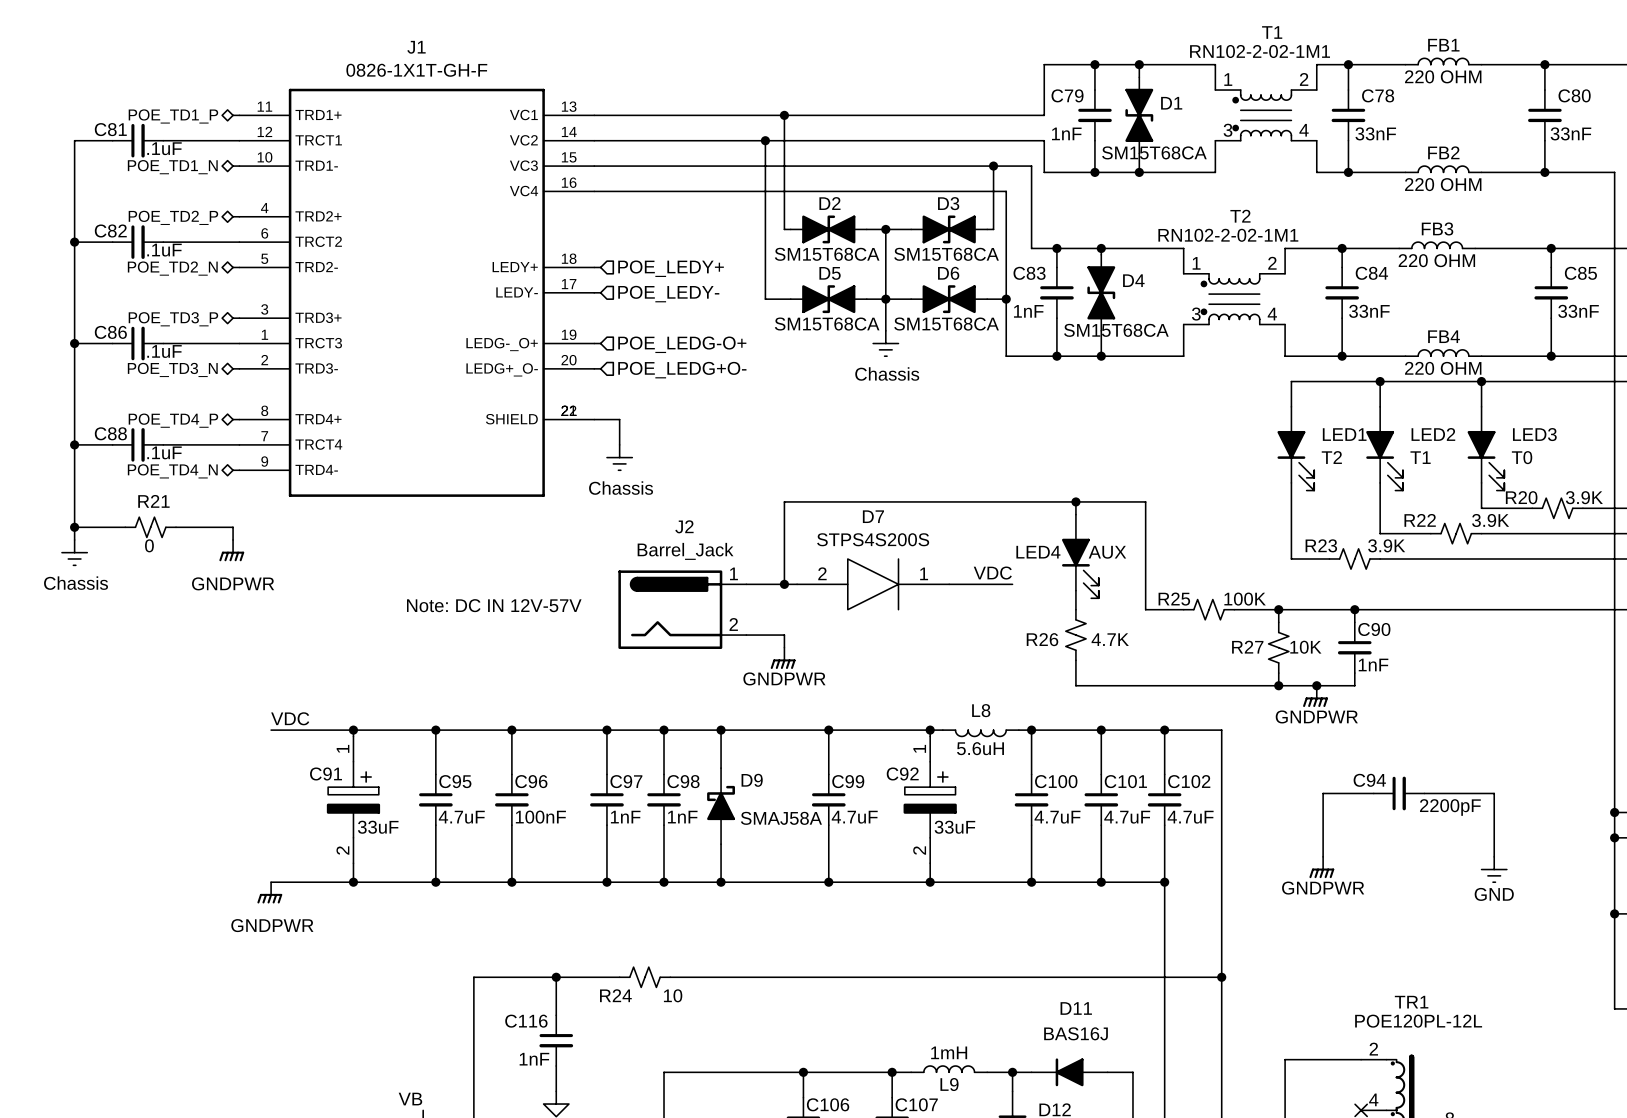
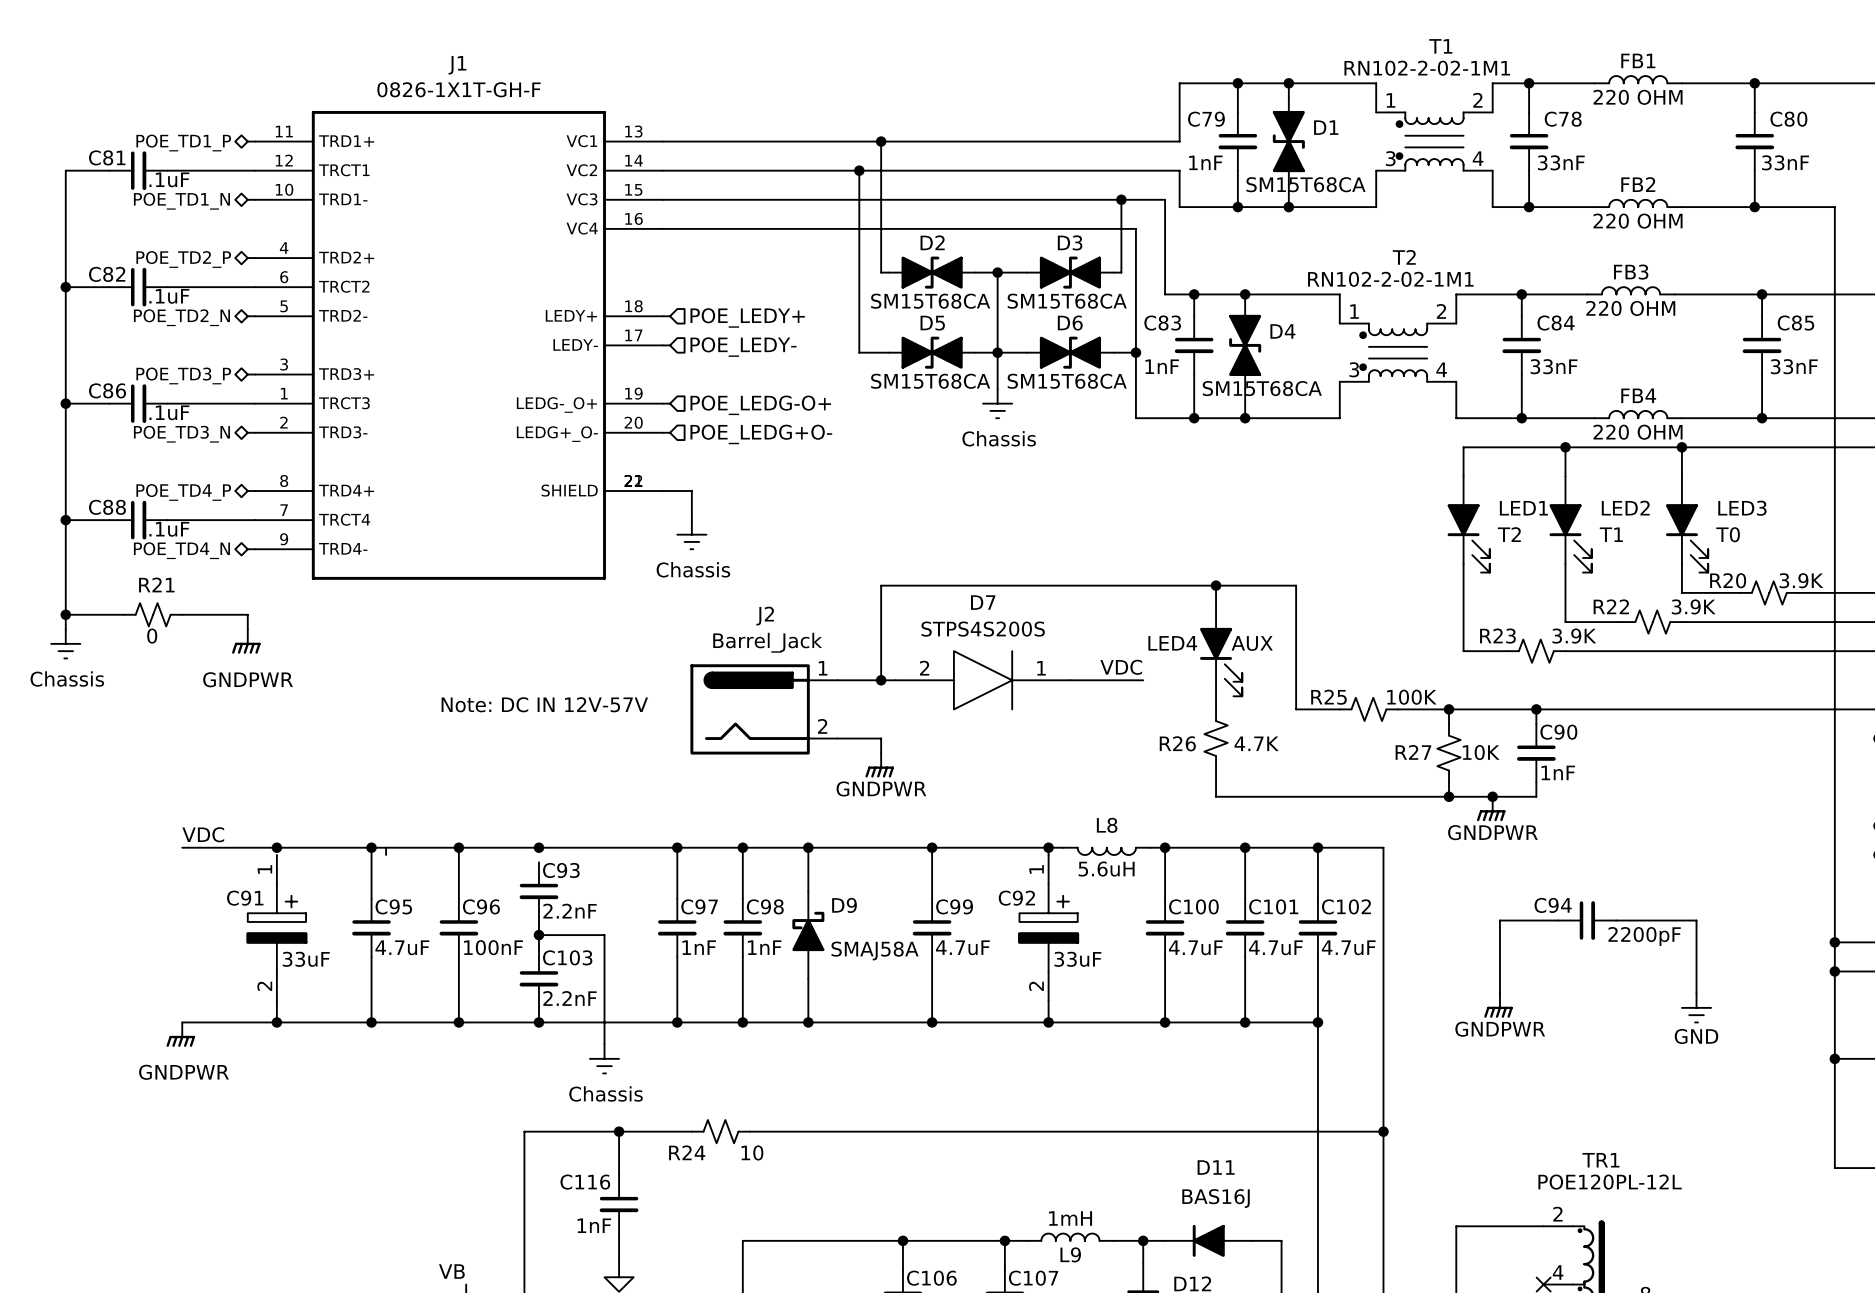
label position: VDC (290, 718) -> VDC (203, 834)
wire: none -> (182, 847) (291, 847)
junction: none -> (276, 847)
junction position: (353, 730) -> (371, 847)
wire: (435, 730) (435, 774) -> (371, 847) (371, 898)
junction position: (435, 730) -> (458, 847)
junction: none -> (538, 847)
wire: (511, 730) (511, 774) -> (458, 847) (458, 898)
junction: (511, 730) -> none
C93: none -> 2.2nF (538, 891)
wire: none -> (538, 920) (538, 949)
C91 position: (353, 799) -> (276, 927)
C95 position: (435, 799) -> (371, 927)
C96 position: (511, 799) -> (458, 927)
wire: none -> (538, 935) (604, 935) (604, 1044)
junction: none -> (538, 935)
wire: (435, 825) (435, 882) -> (371, 956) (371, 1022)
wire: (511, 825) (511, 882) -> (458, 956) (458, 1022)
C103: none -> 2.2nF (538, 978)
wire: (353, 863) (353, 882) -> (276, 1000) (276, 1022)
wire: none -> (538, 1007) (538, 1022)
wire: none -> (182, 1022) (291, 1022)
junction: none -> (276, 1022)
junction position: (353, 882) -> (371, 1022)
junction position: (435, 882) -> (458, 1022)
junction: none -> (538, 1022)
junction: (511, 882) -> none
power symbol position: GNDPWR (269, 892) -> GNDPWR (180, 1034)
power symbol: none -> Chassis (604, 1058)

